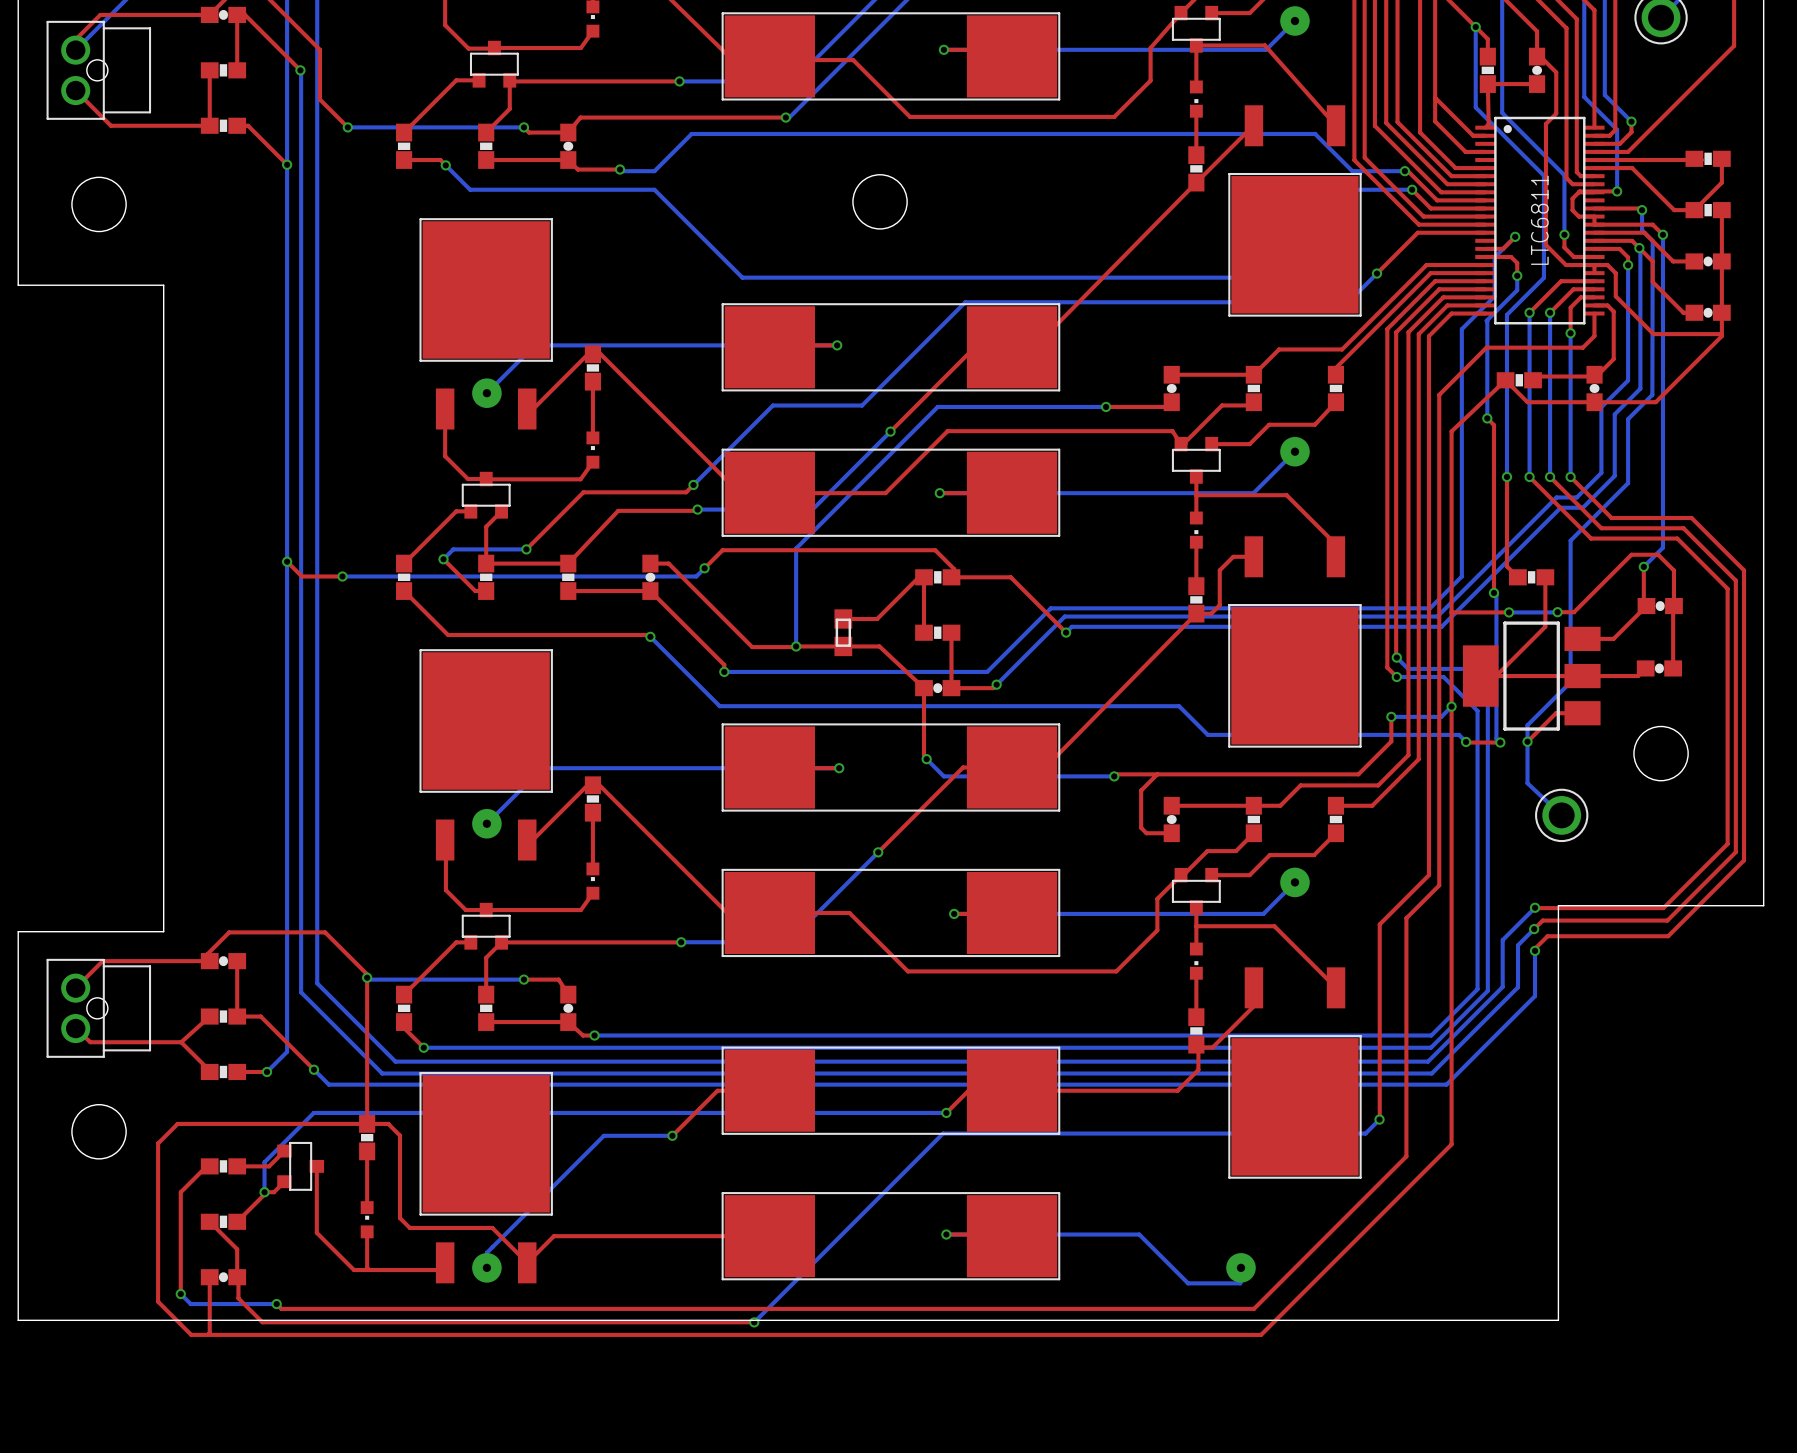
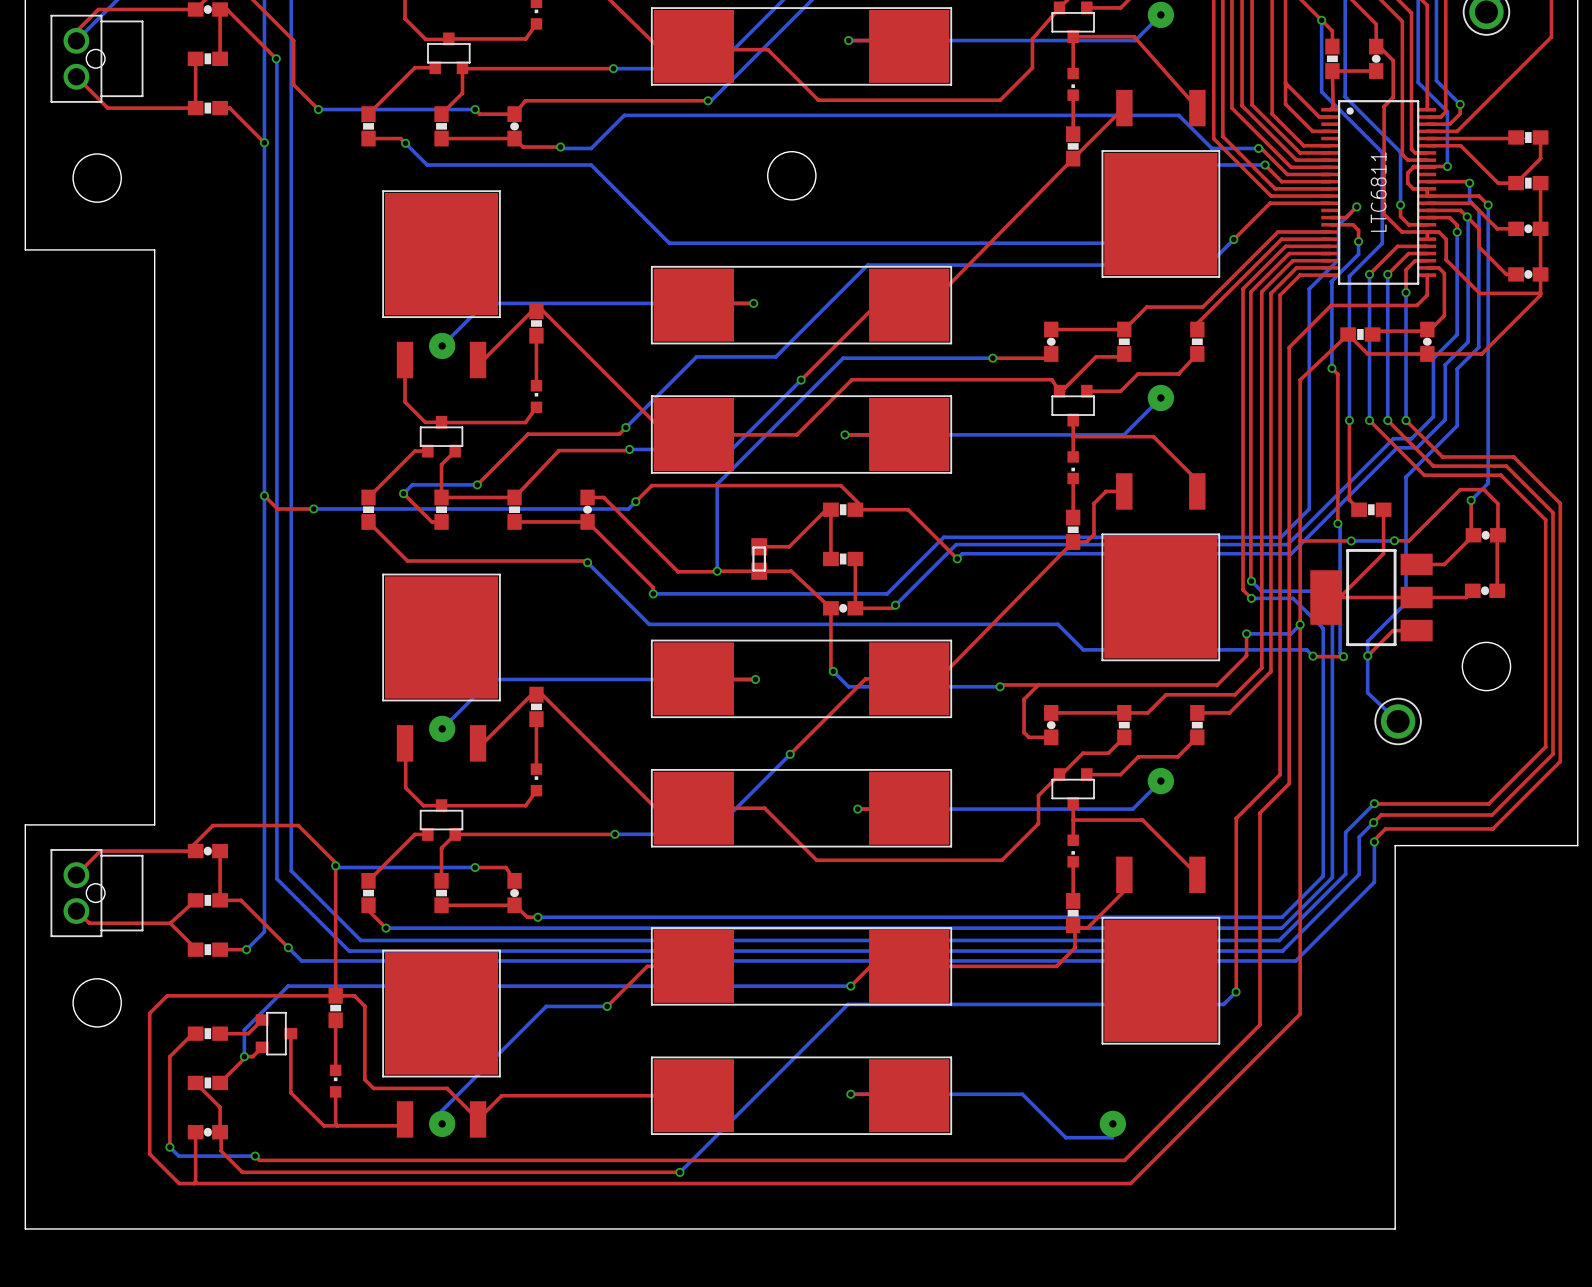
board edge: (1763, 905) (1558, 905) (1558, 954) -> (1577, 801) (1577, 845) (1395, 845)
board edge: (18, 1320) (1558, 1320) -> (25, 1170) (25, 1228) (1395, 1228) (1395, 1170)

